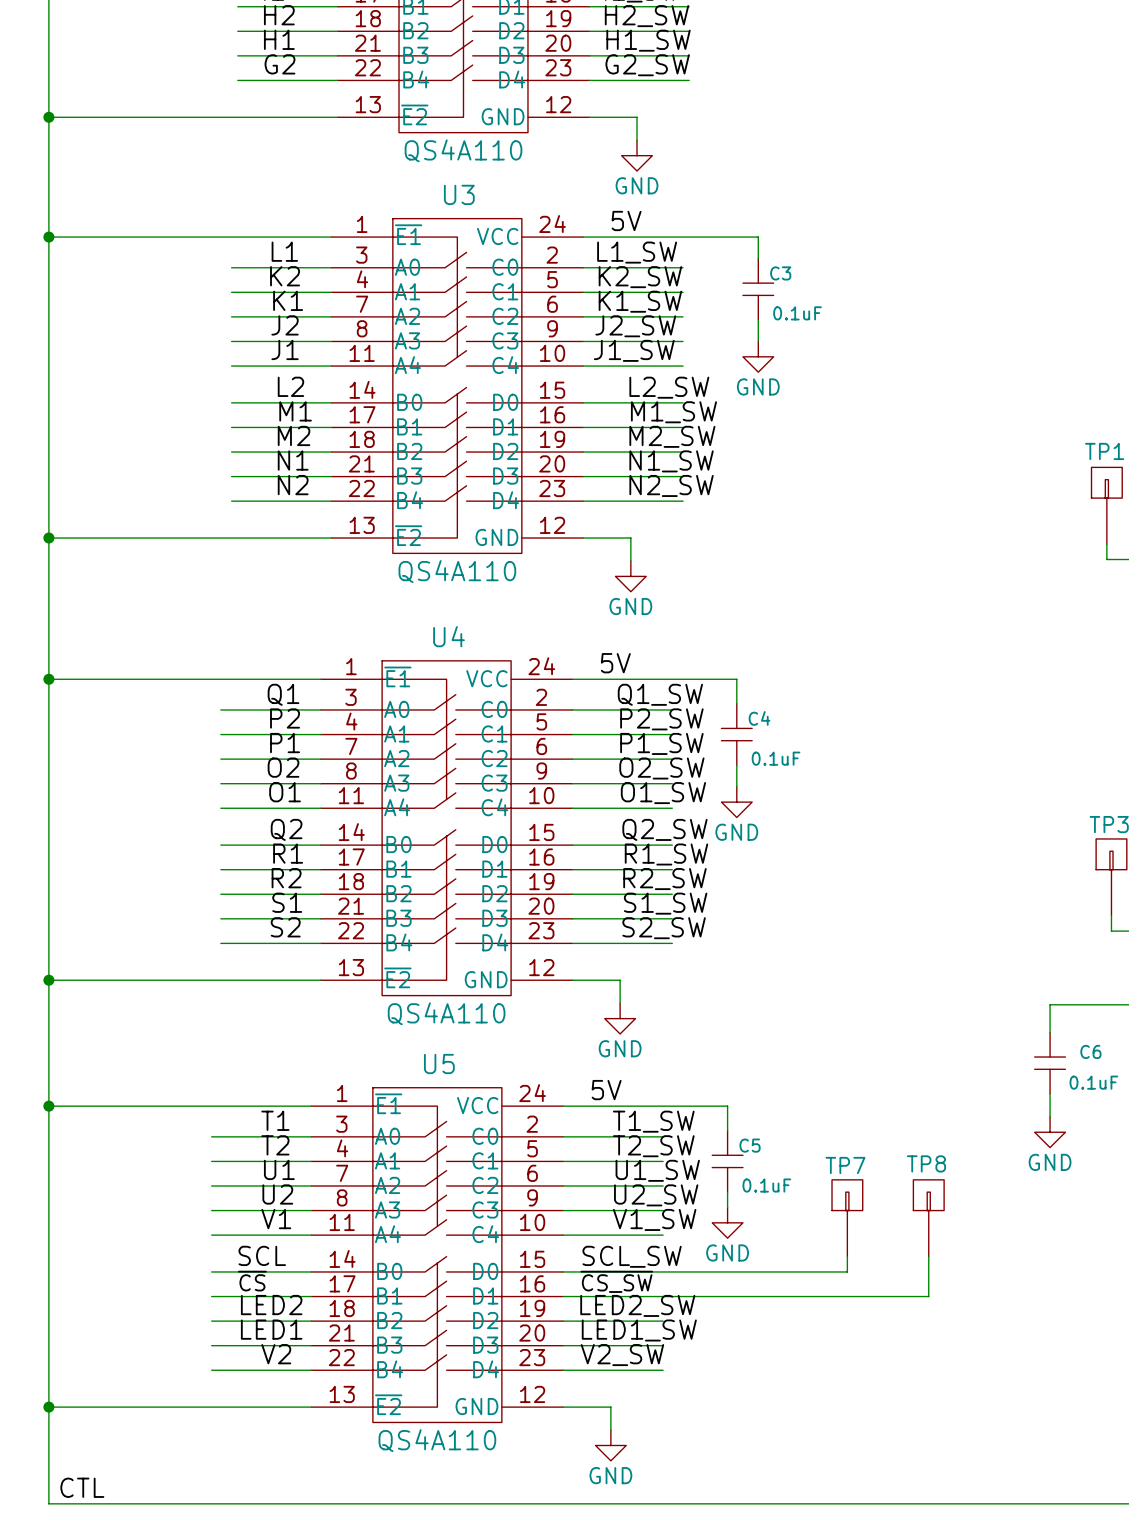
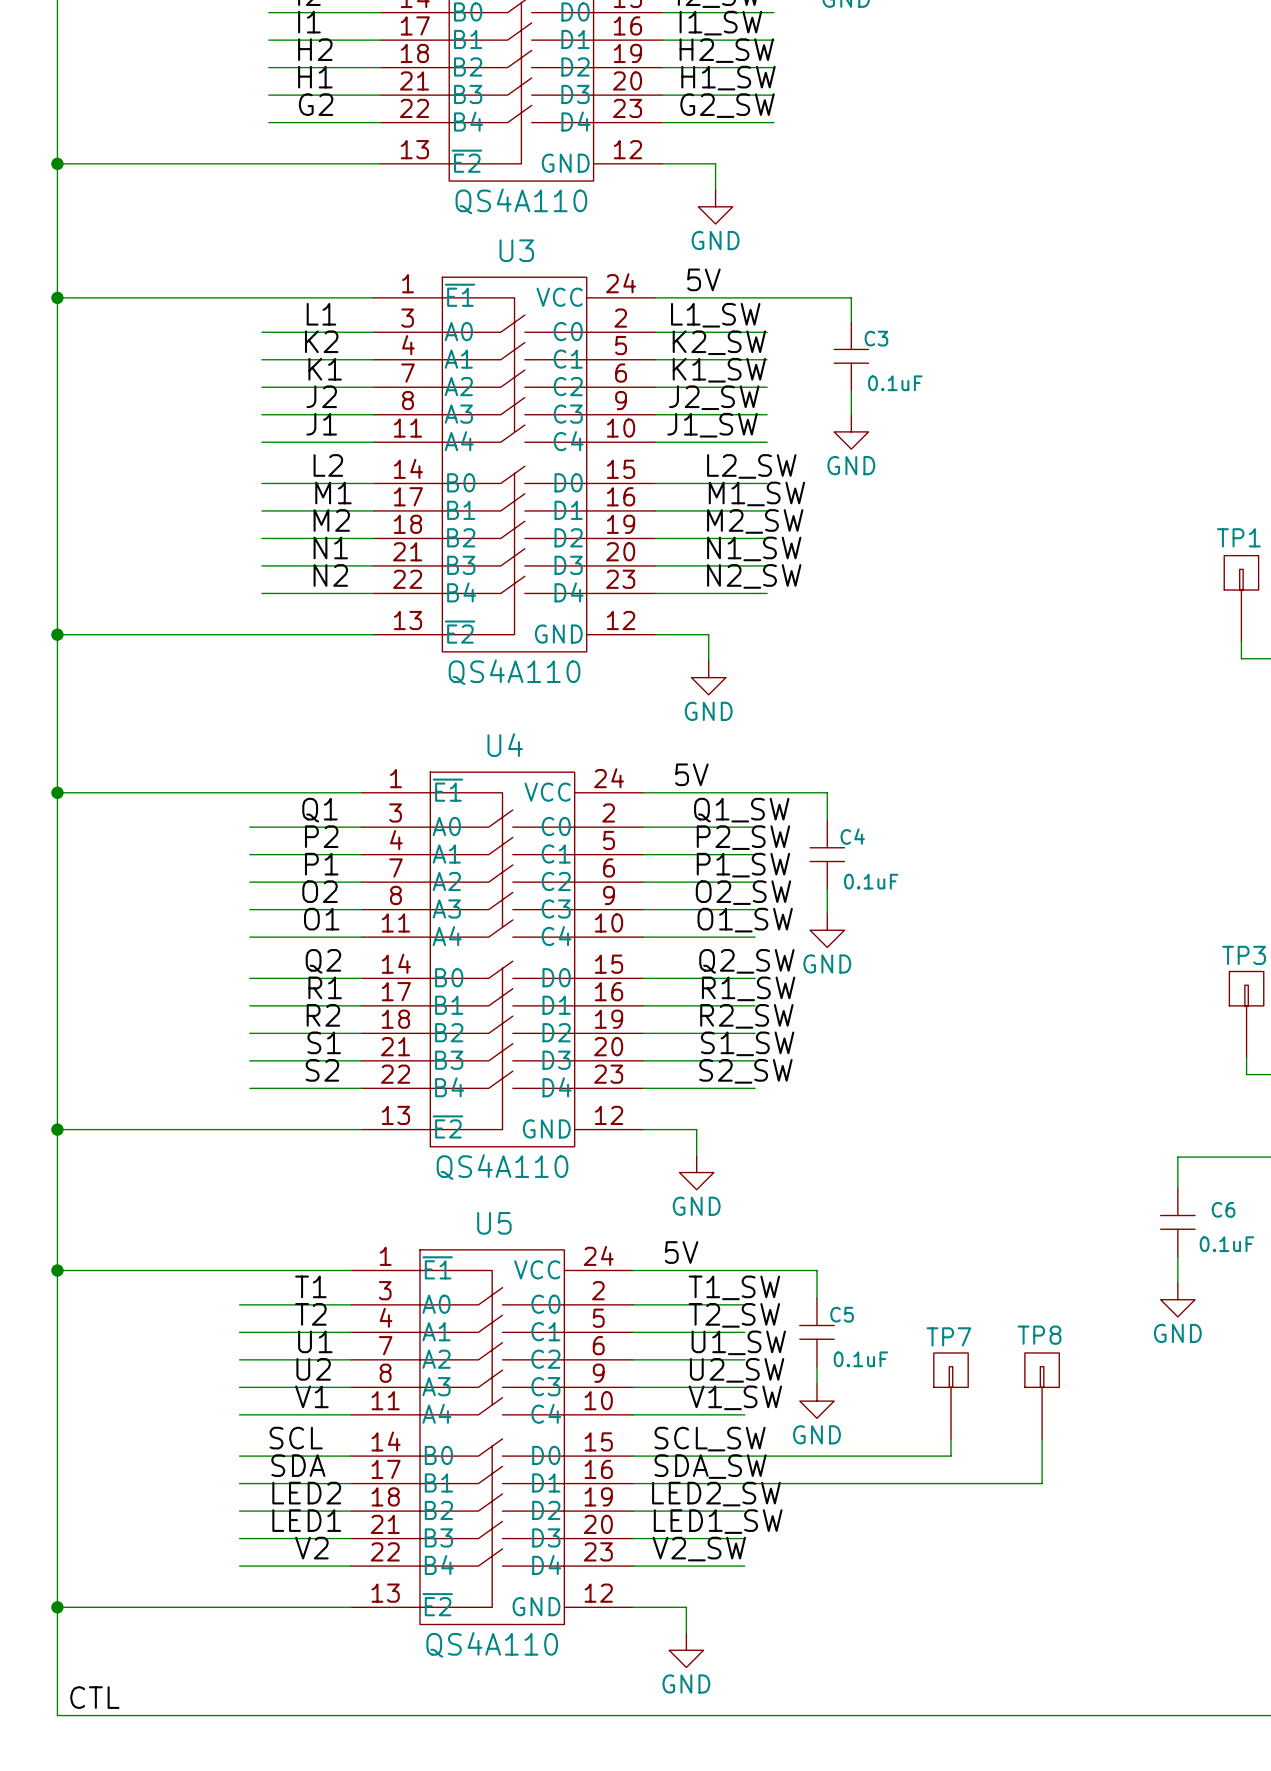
label: ~{CS} (252, 1281) -> SDA (298, 1465)
label: ~{CS_SW} (616, 1281) -> SDA_SW (710, 1466)

